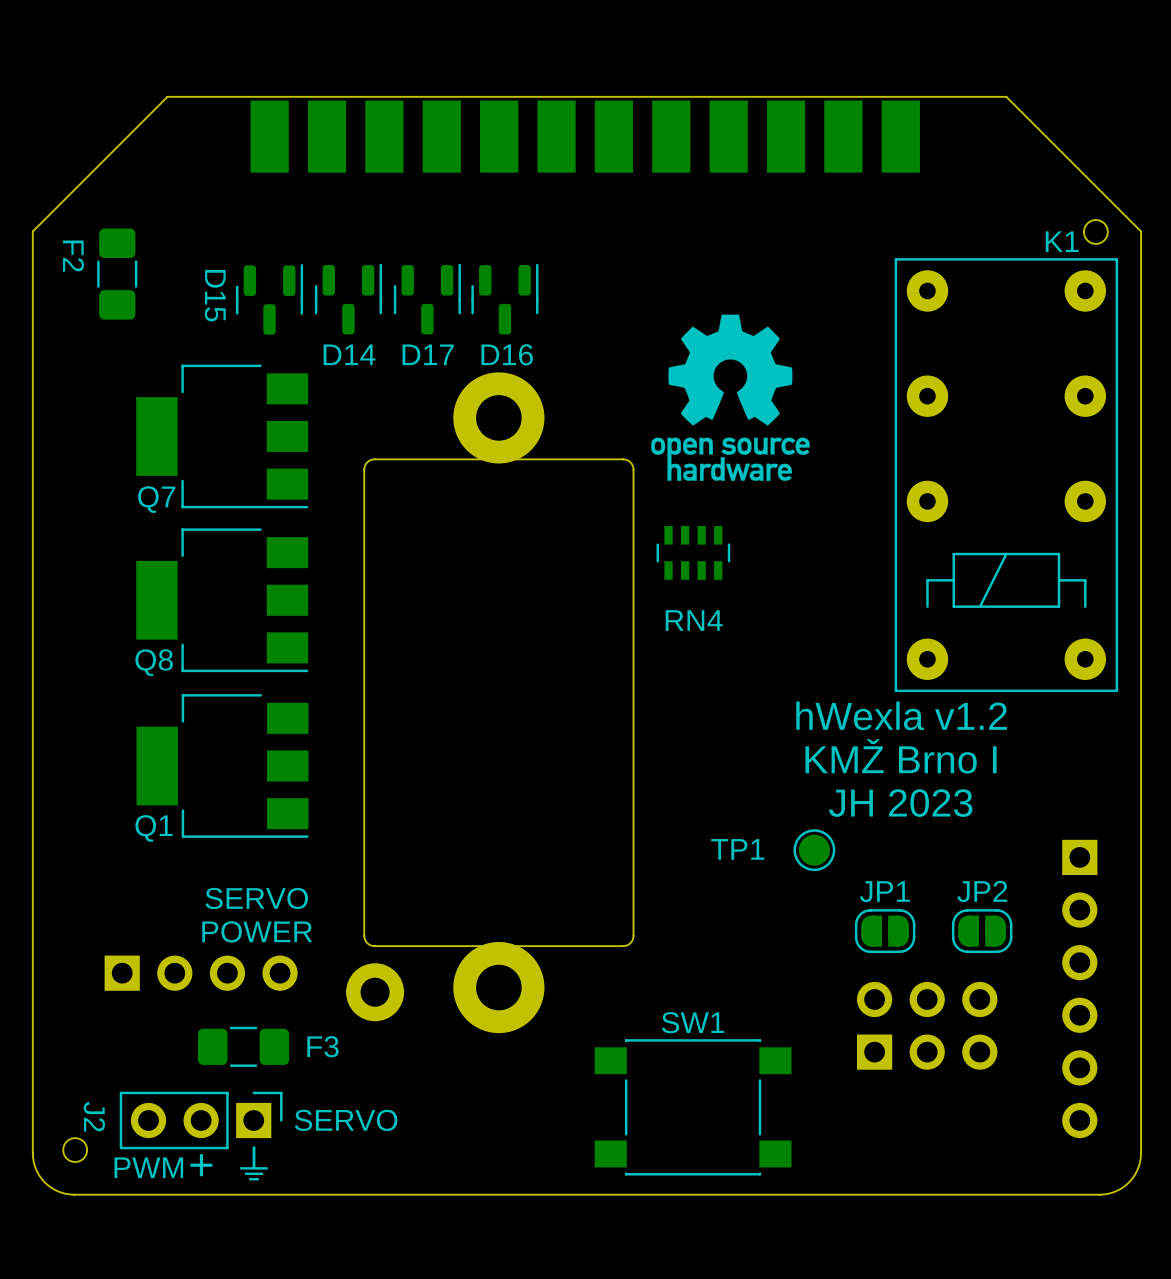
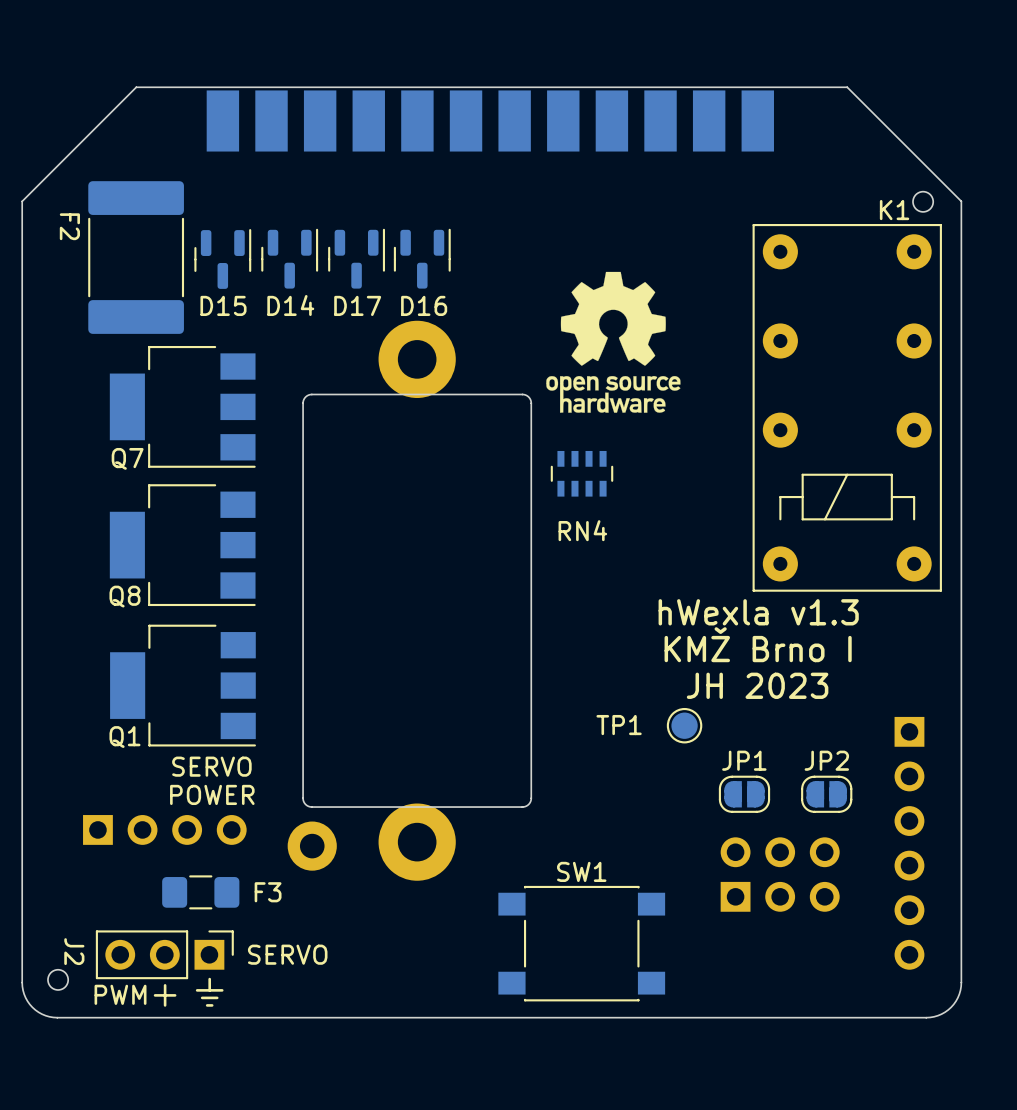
F2 footprint: [97, 228, 138, 320] -> [88, 181, 185, 334]
D15 name rotation: 0° (215, 295) -> 90° counterclockwise (223, 305)
D15 name position: D15 (215, 295) -> D15 (223, 305)
Q7 position: (222, 436) -> (182, 406)
Q8 position: (222, 600) -> (182, 545)
text: hWexla v1.2 (901, 715) -> hWexla v1.3 (758, 612)
Q1 position: (222, 766) -> (183, 685)

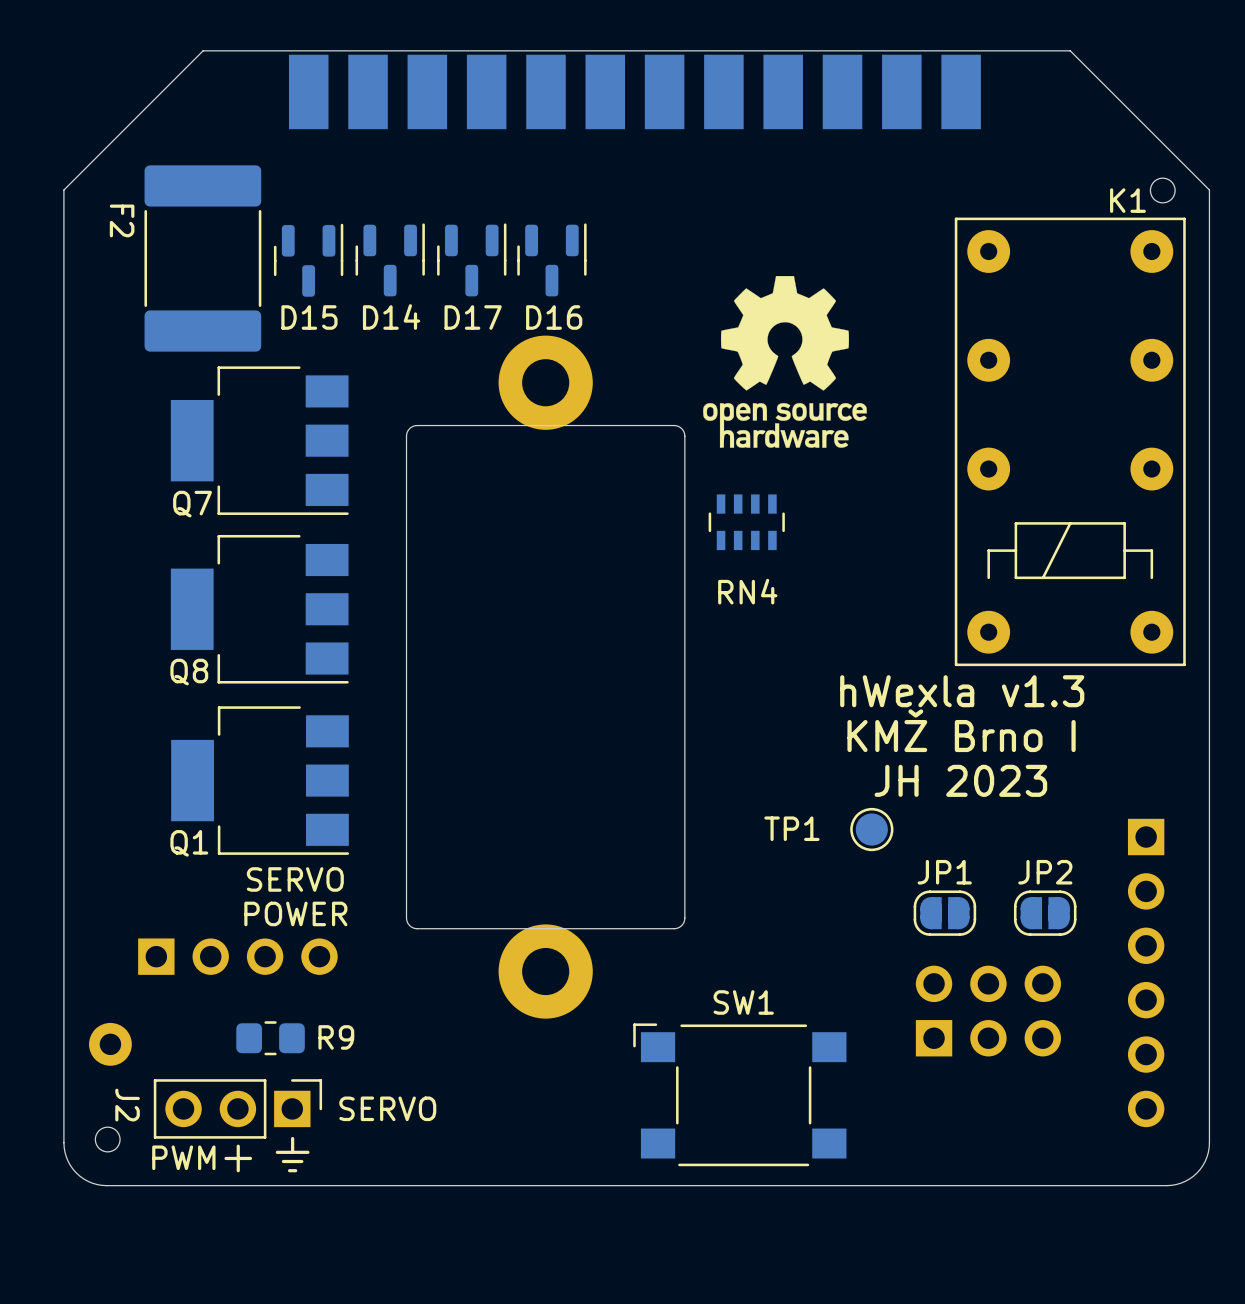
part: (312, 846) -> none
SW1 footprint: [498, 885, 666, 1002] -> [633, 1023, 847, 1167]
F3: (200, 892) -> none
R9: none -> (270, 1038)
part: none -> (110, 1044)

